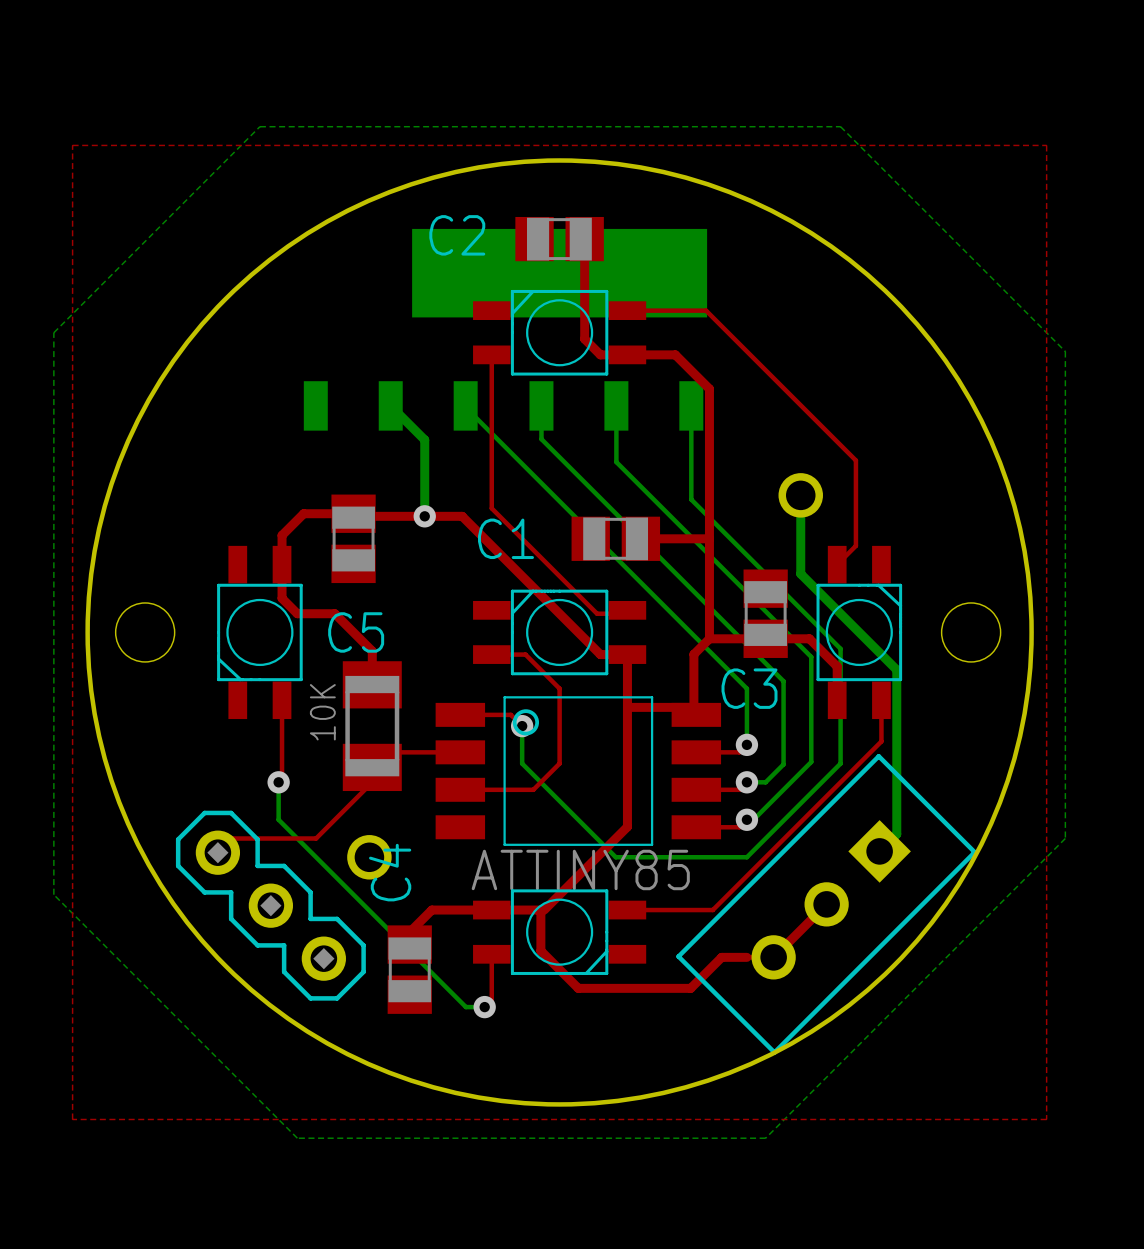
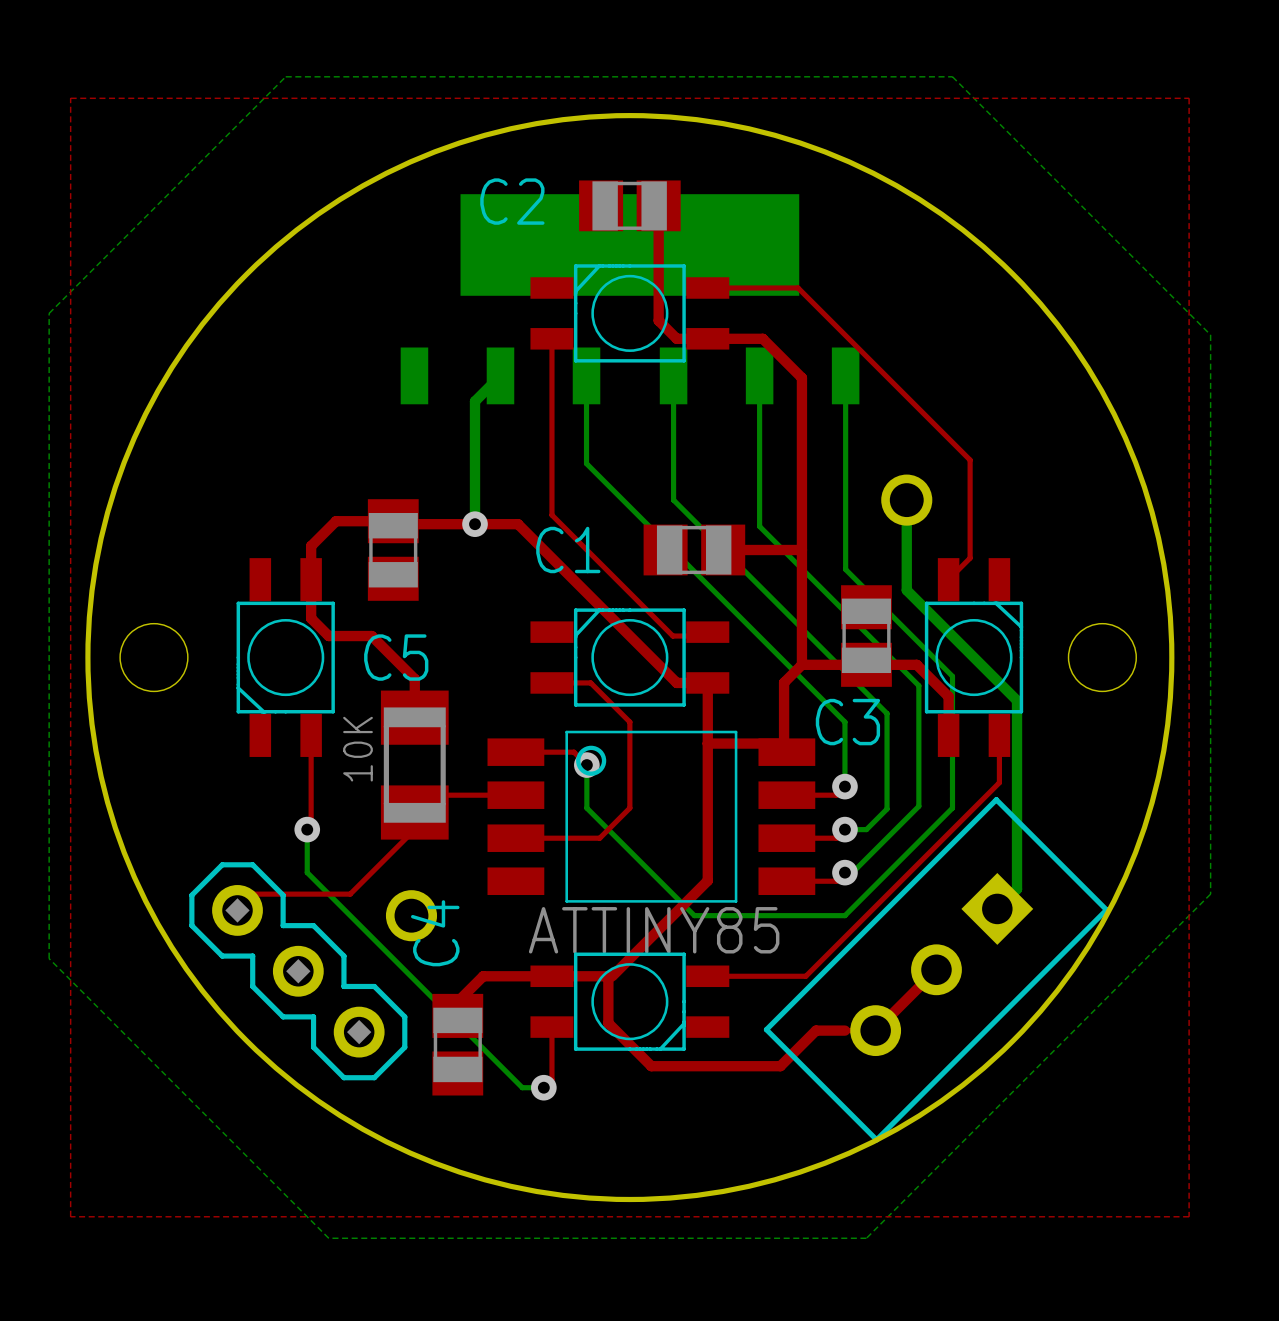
bottom track: (390, 405) (424, 439) -> (500, 375) (475, 401) (475, 436)
part position: (390, 405) -> (500, 375)
bottom track: (465, 405) (521, 463) -> (586, 375) (586, 463)
bottom track: (541, 405) (541, 439) (597, 495) -> (673, 375) (673, 500)
bottom track: (616, 405) (616, 462) (672, 518) -> (759, 375) (759, 526)
part position: (616, 405) -> (759, 375)
bottom track: (691, 405) (691, 499) (747, 555) -> (845, 375) (845, 569)

